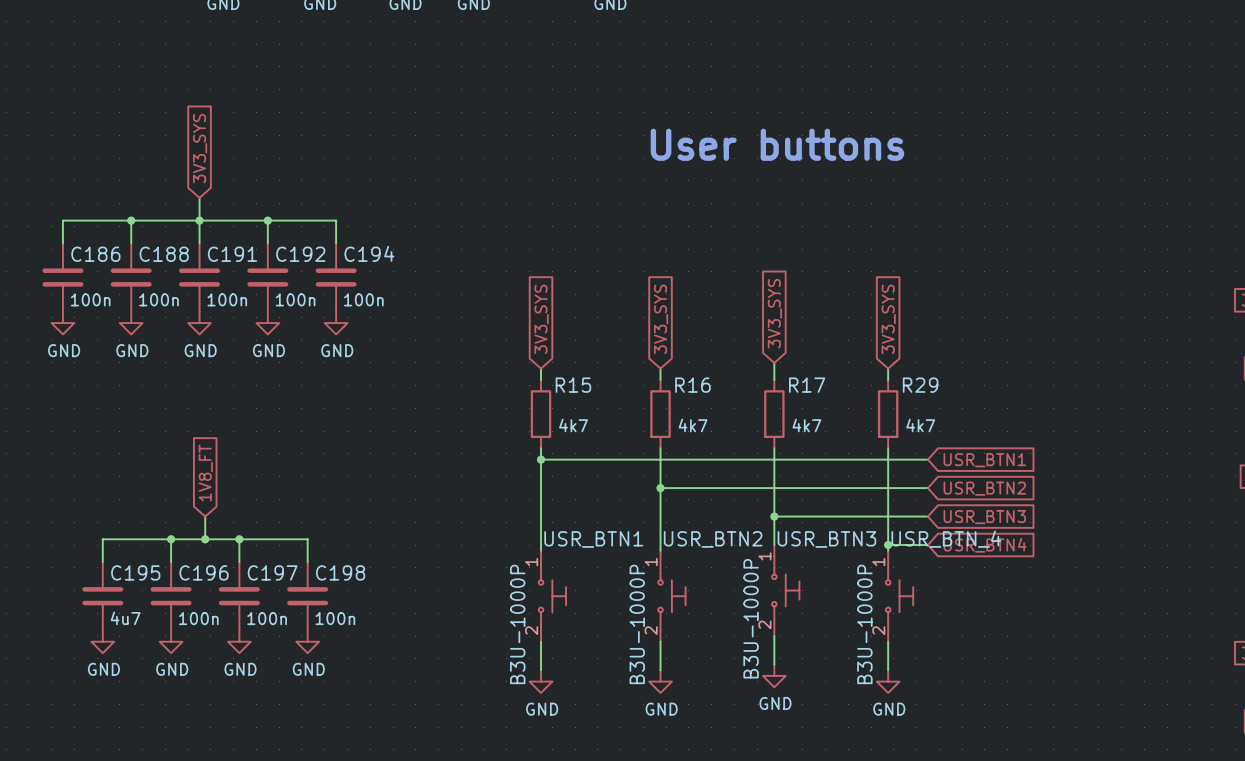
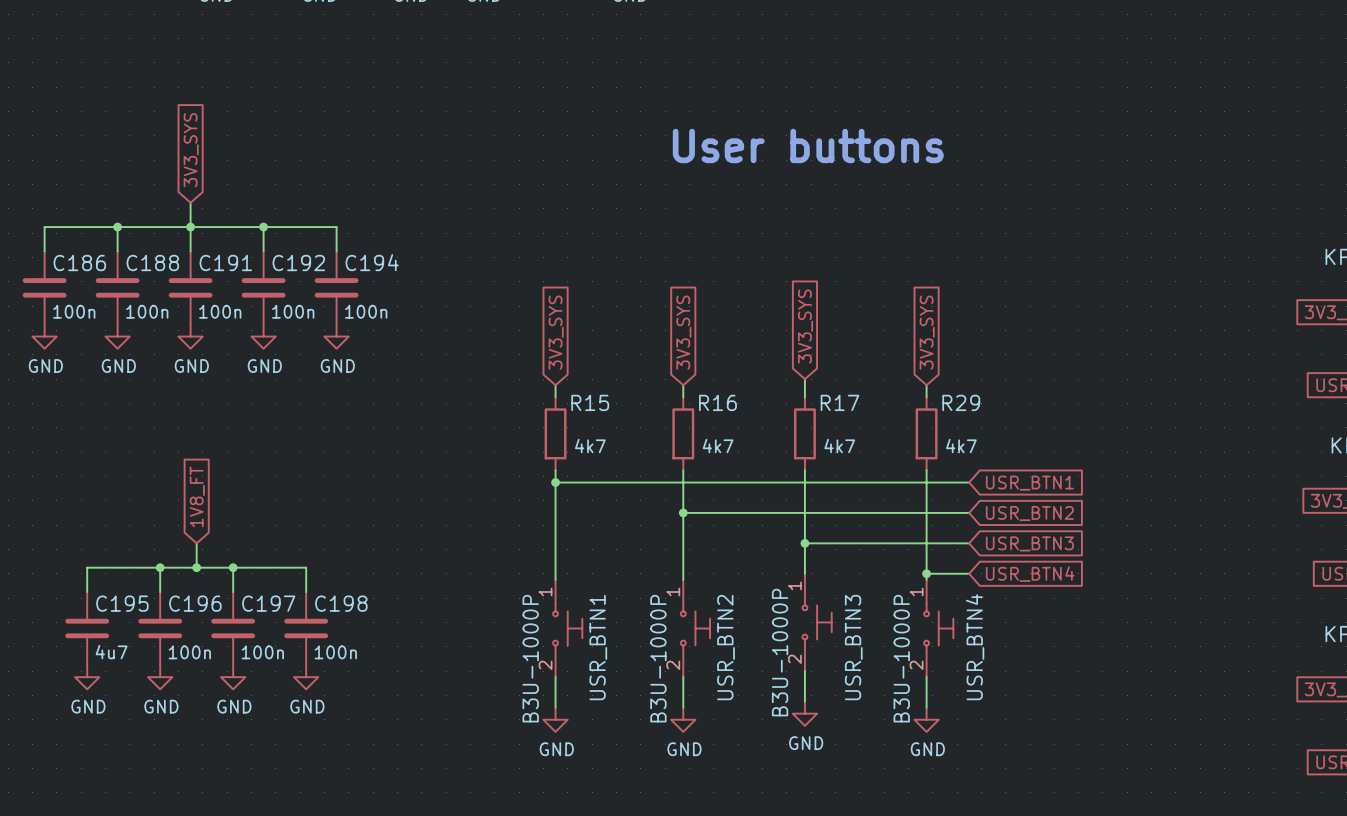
USR_BTN1 name rotation: 0° (593, 539) -> 90° counterclockwise (598, 647)
USR_BTN2 name rotation: 0° (713, 539) -> 90° counterclockwise (726, 647)
USR_BTN3 name rotation: 0° (826, 539) -> 90° counterclockwise (853, 647)
USR_BTN_4 name: USR_BTN_4 (946, 539) -> USR_BTN4 (975, 647)

